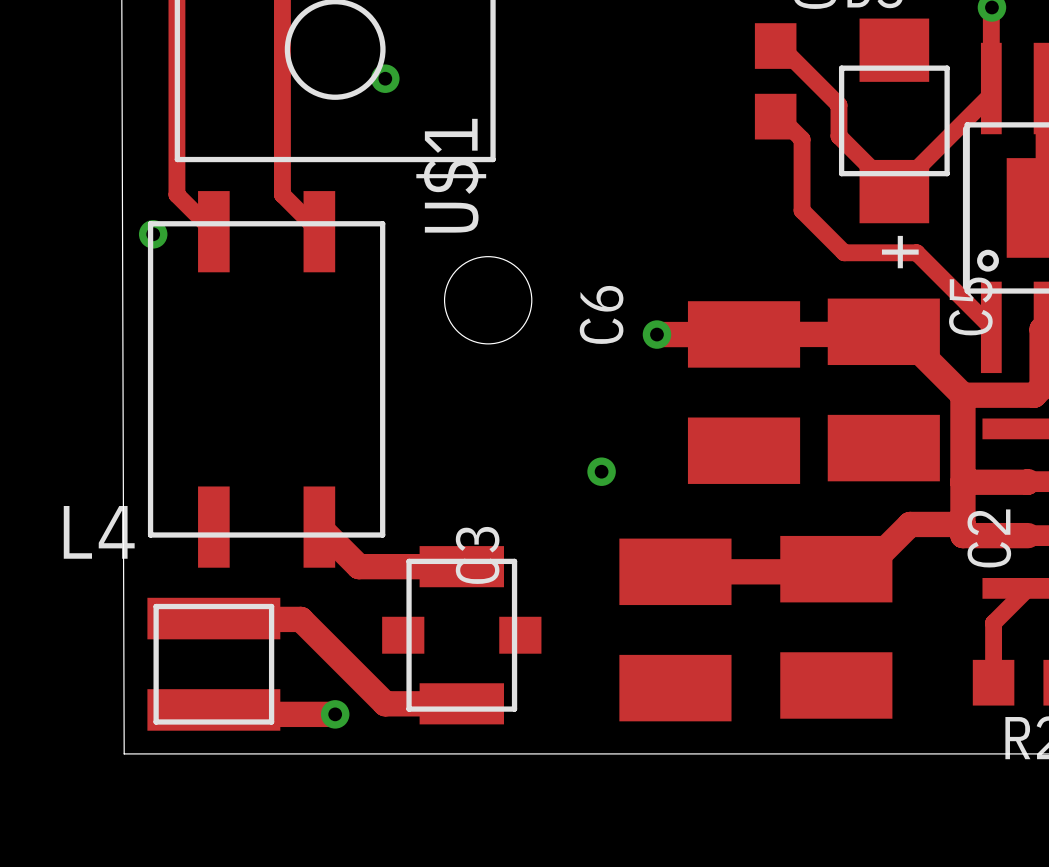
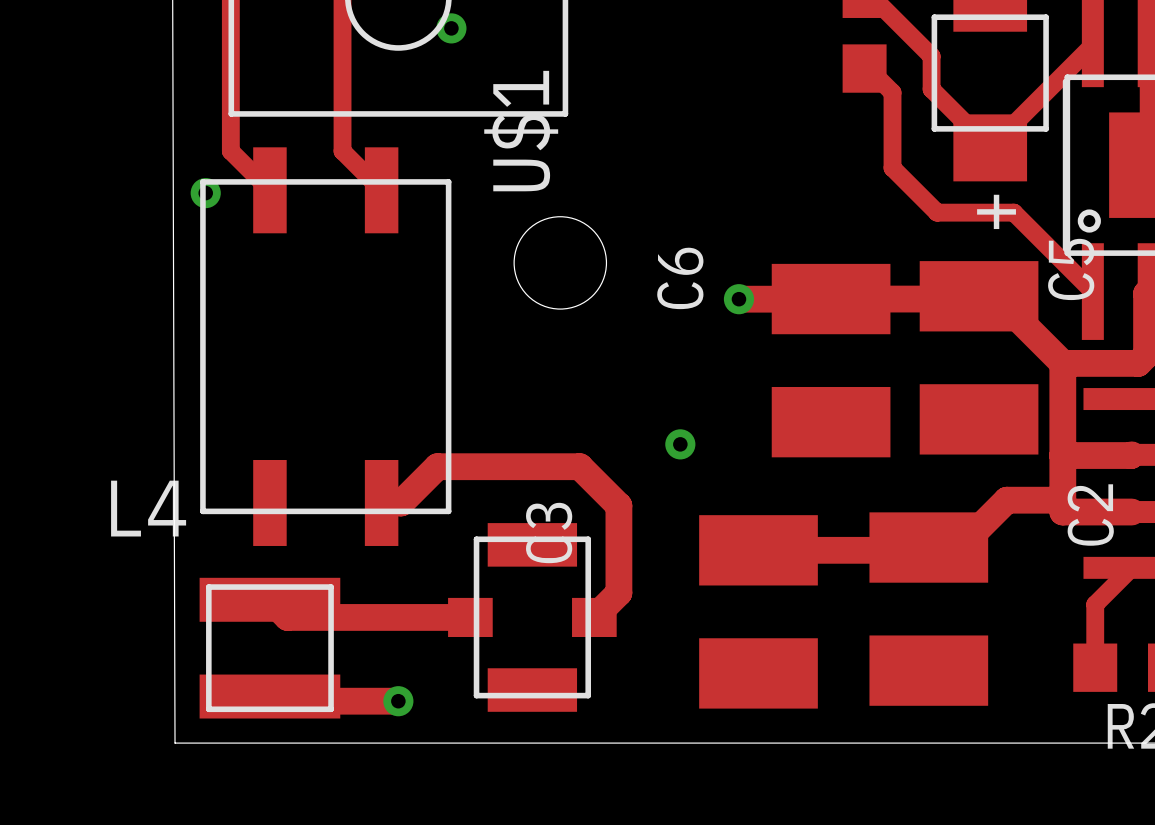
track: (319, 527) (358, 566) (461, 566) -> (381, 502) (401, 502) (437, 466) (579, 466) (618, 505) (618, 592) (594, 617)
track: (214, 619) (300, 619) (385, 703) (461, 703) -> (270, 600) (287, 617) (470, 617)

